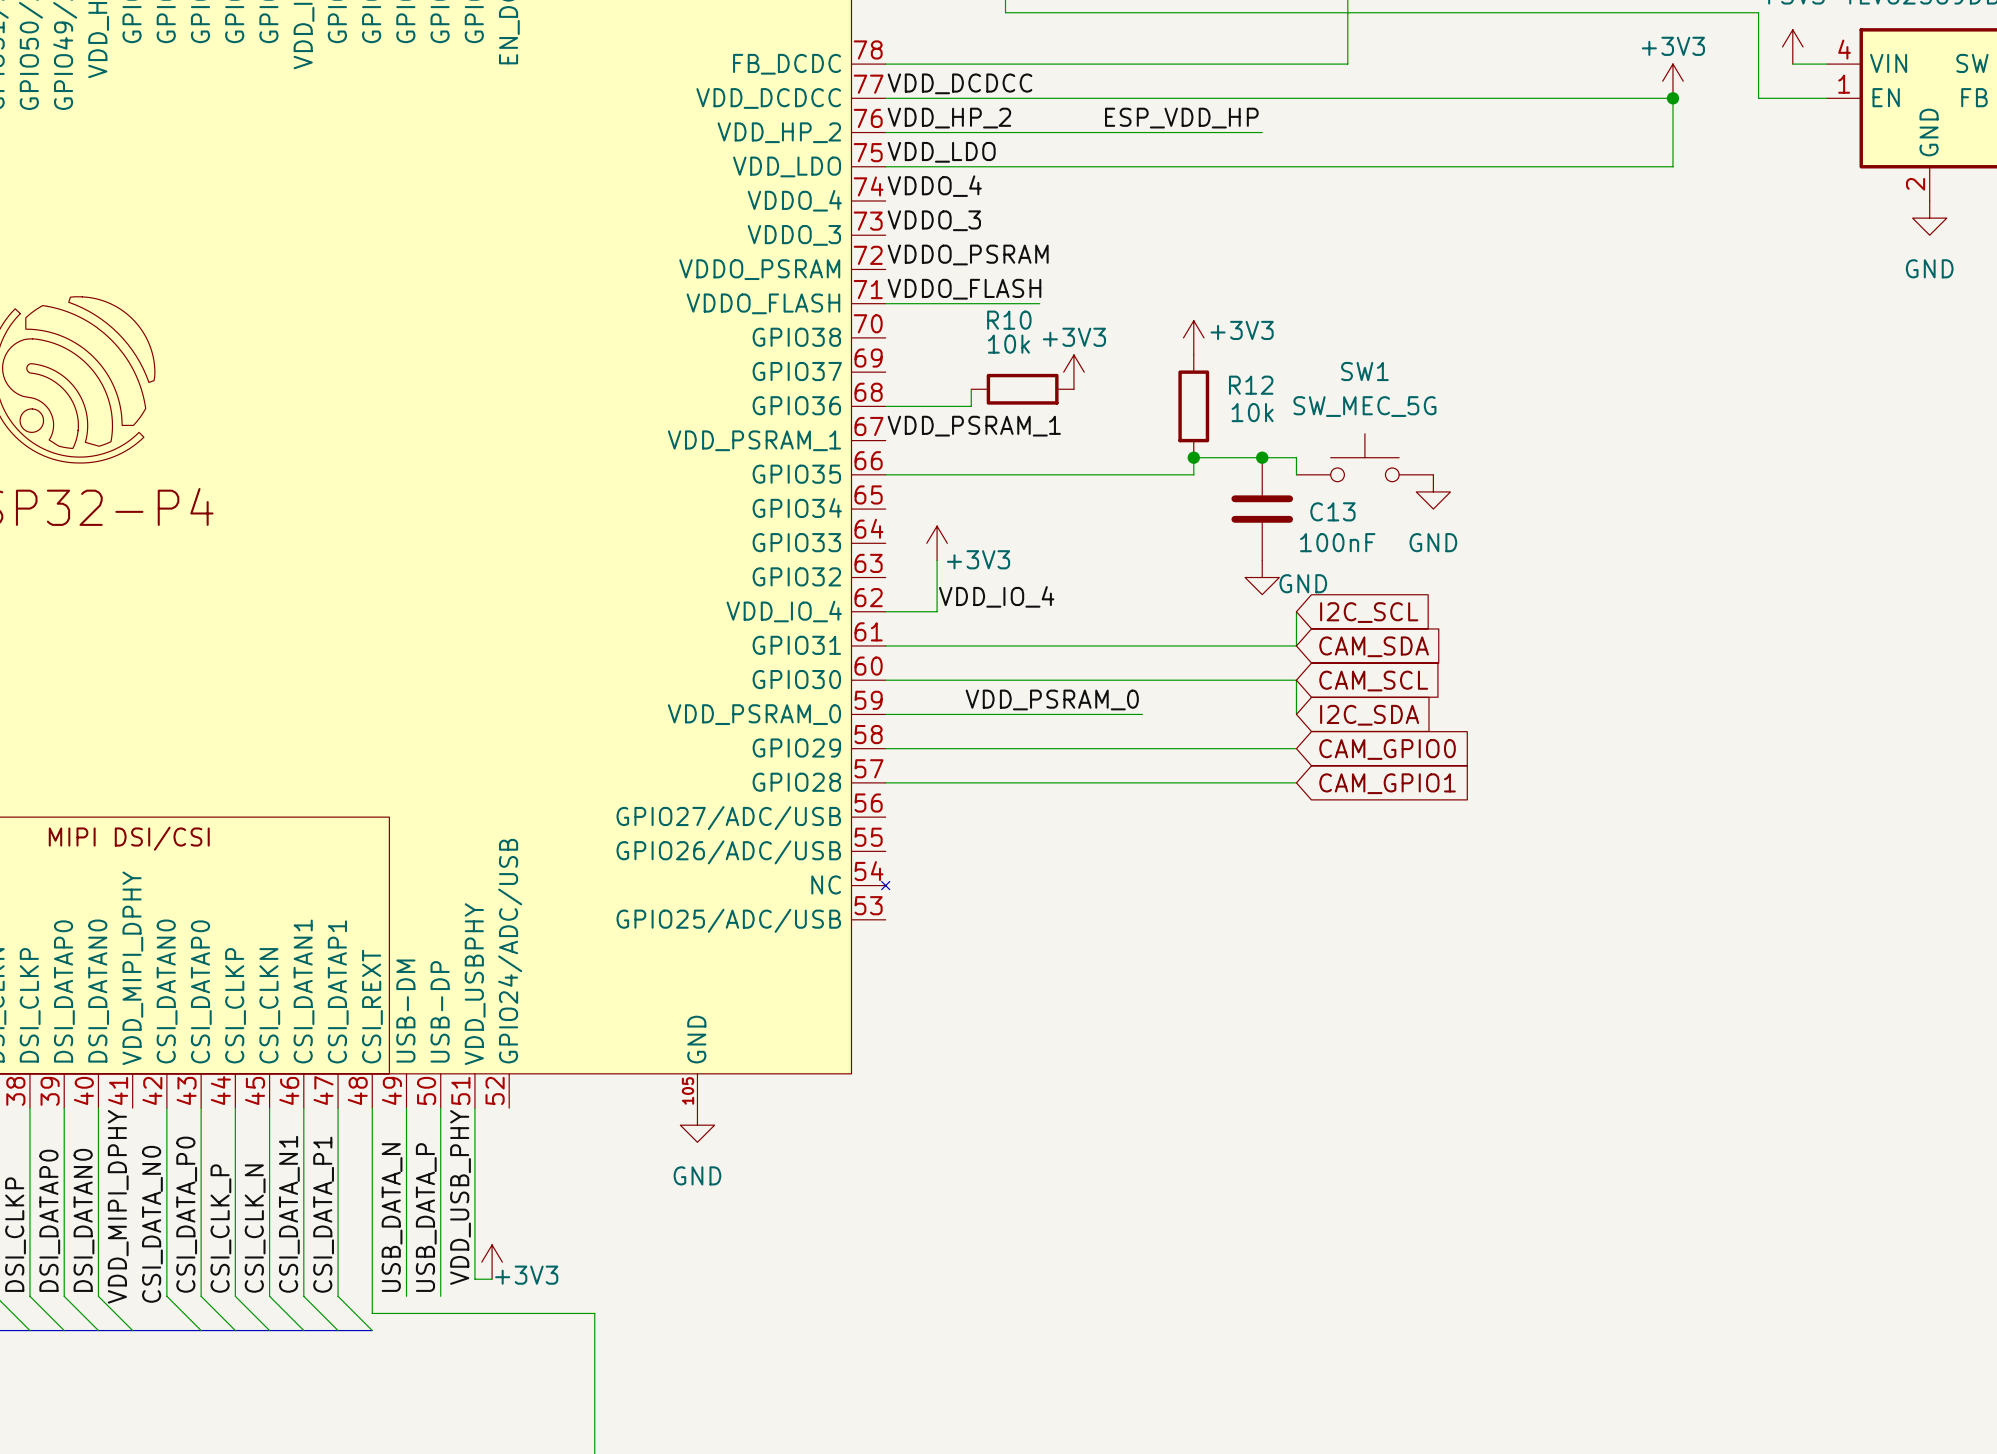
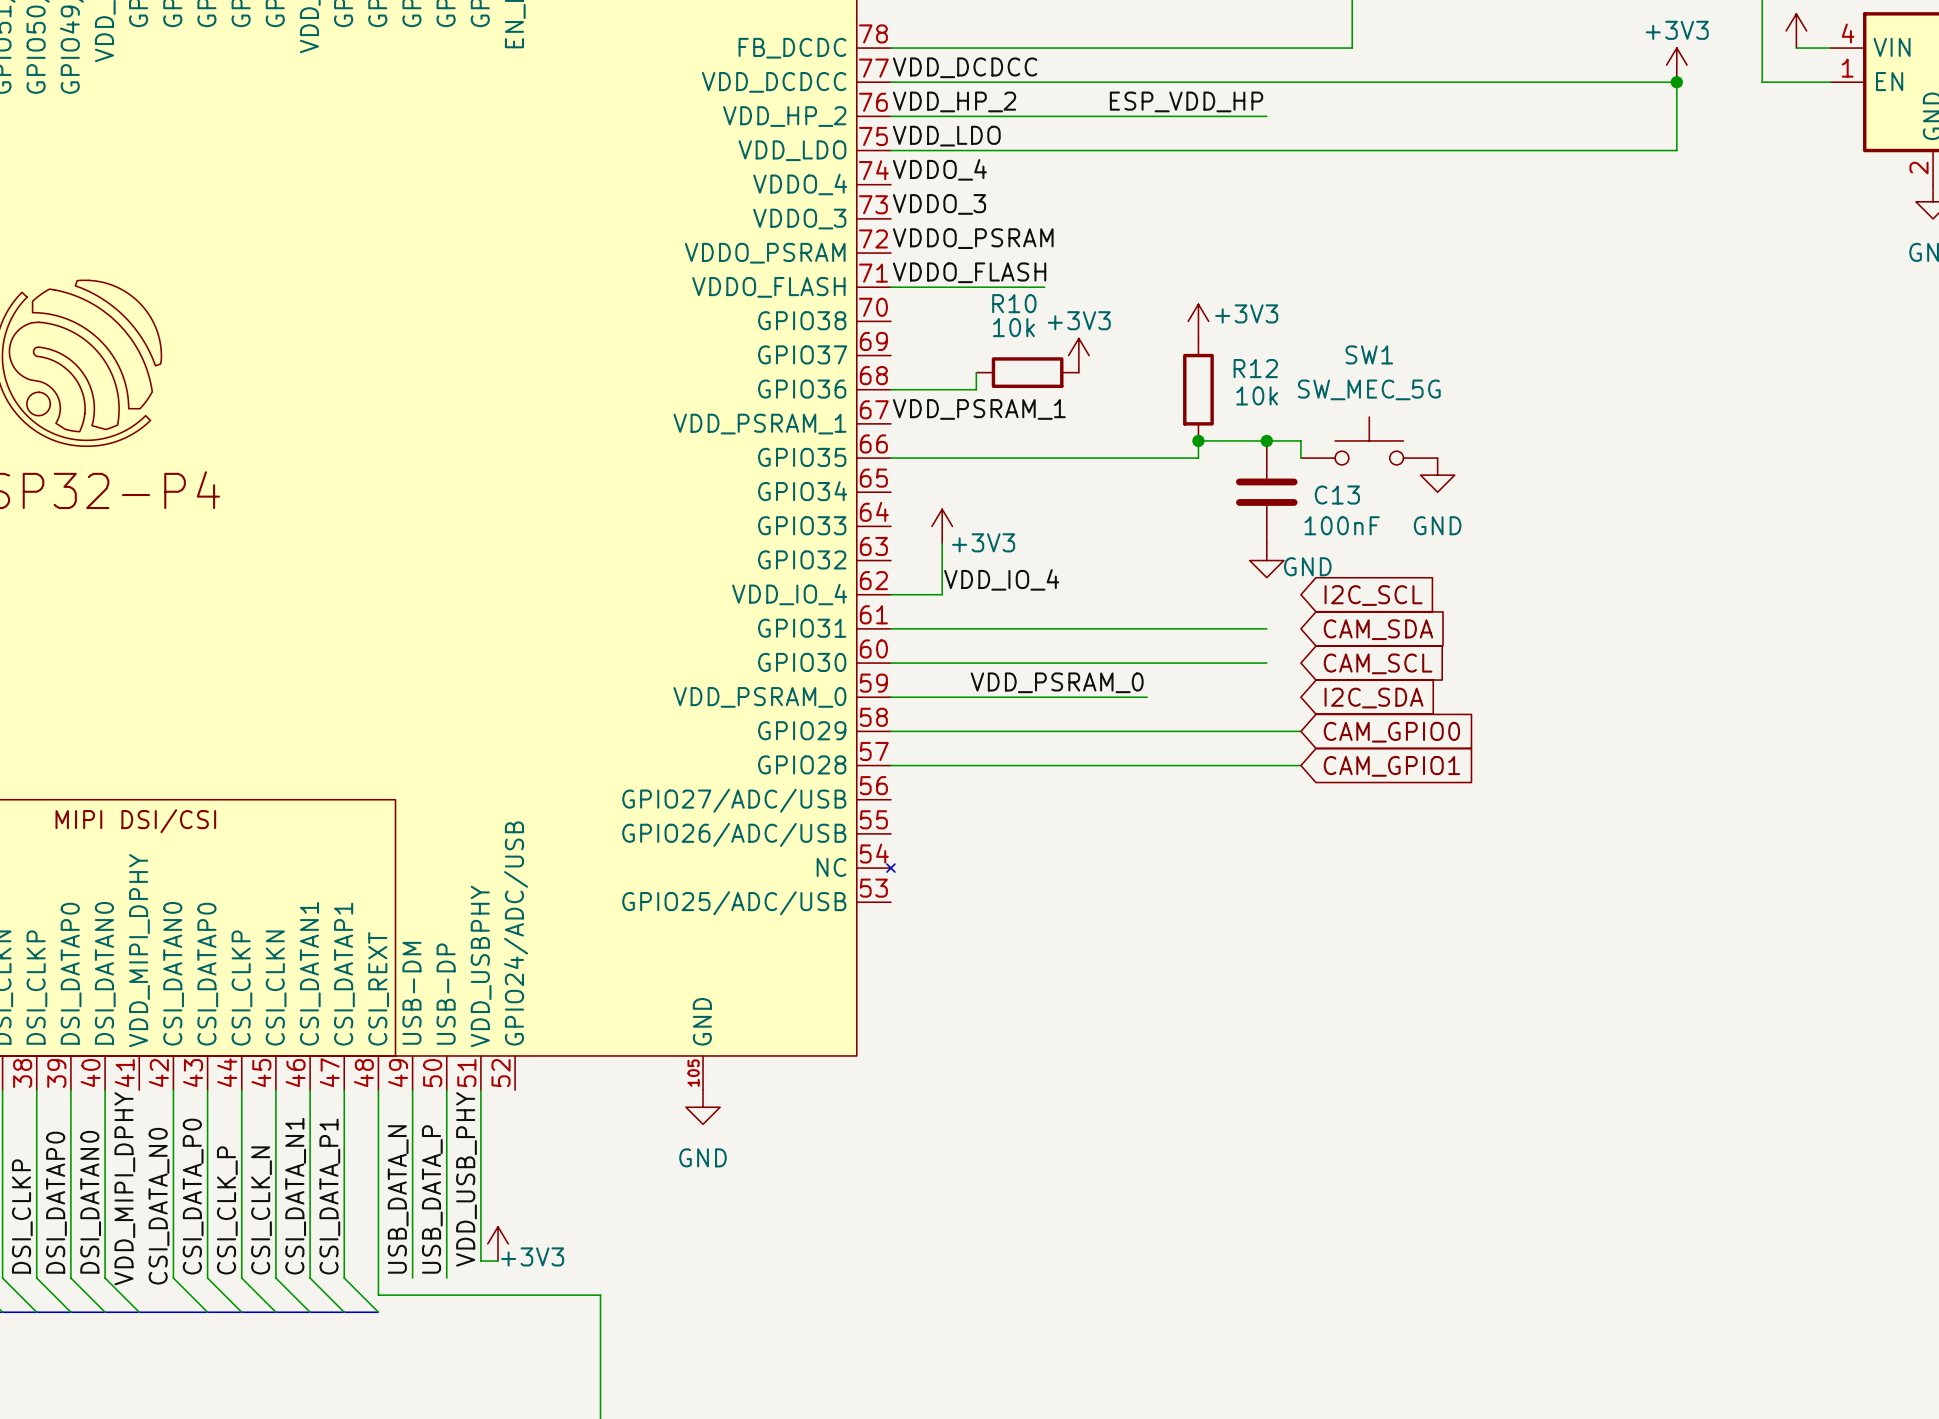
wire: (1296, 611) (1296, 645) (1262, 645) -> none
wire: (1262, 680) (1296, 680) (1296, 714) -> none

